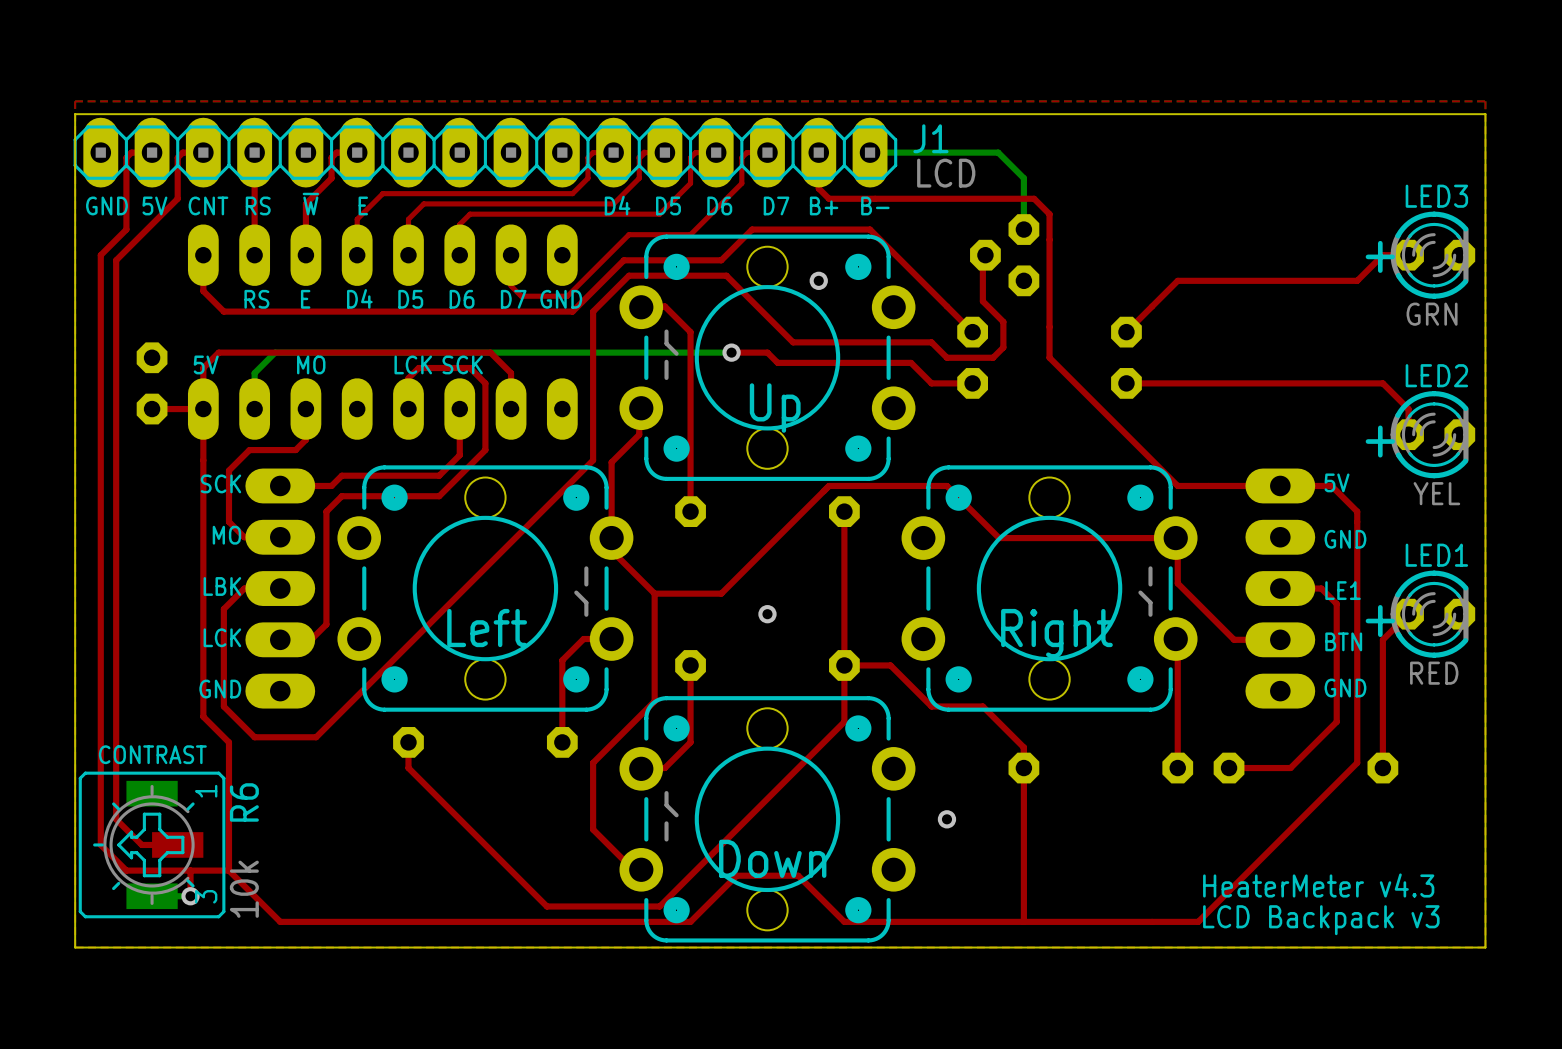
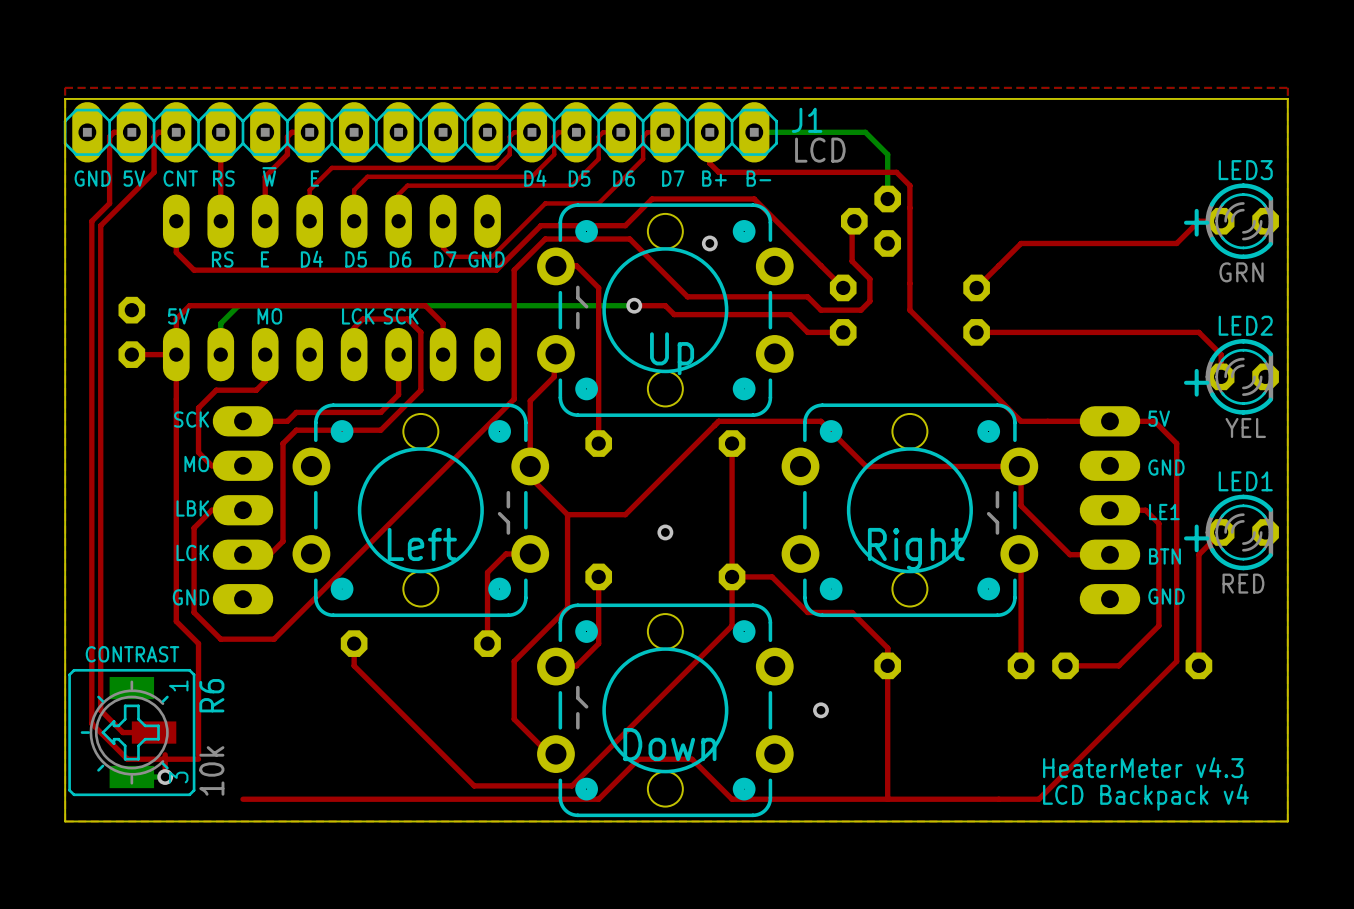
top track: (126, 229) (100, 255) (100, 844) (126, 870) (228, 870) (280, 921) -> (109, 199) (109, 203) (91, 221) (91, 723) (127, 759) (198, 759)
text: LCD Backpack v3 (1321, 920) -> LCD Backpack v4 (1145, 797)

